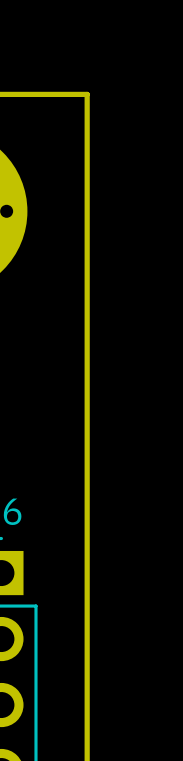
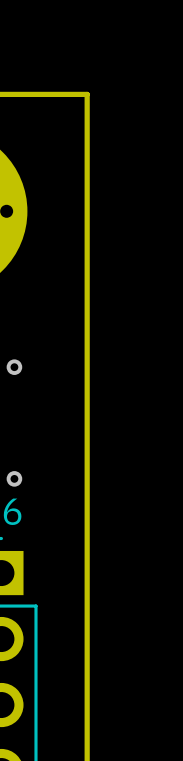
via: none -> (14, 367)
via: none -> (14, 478)

